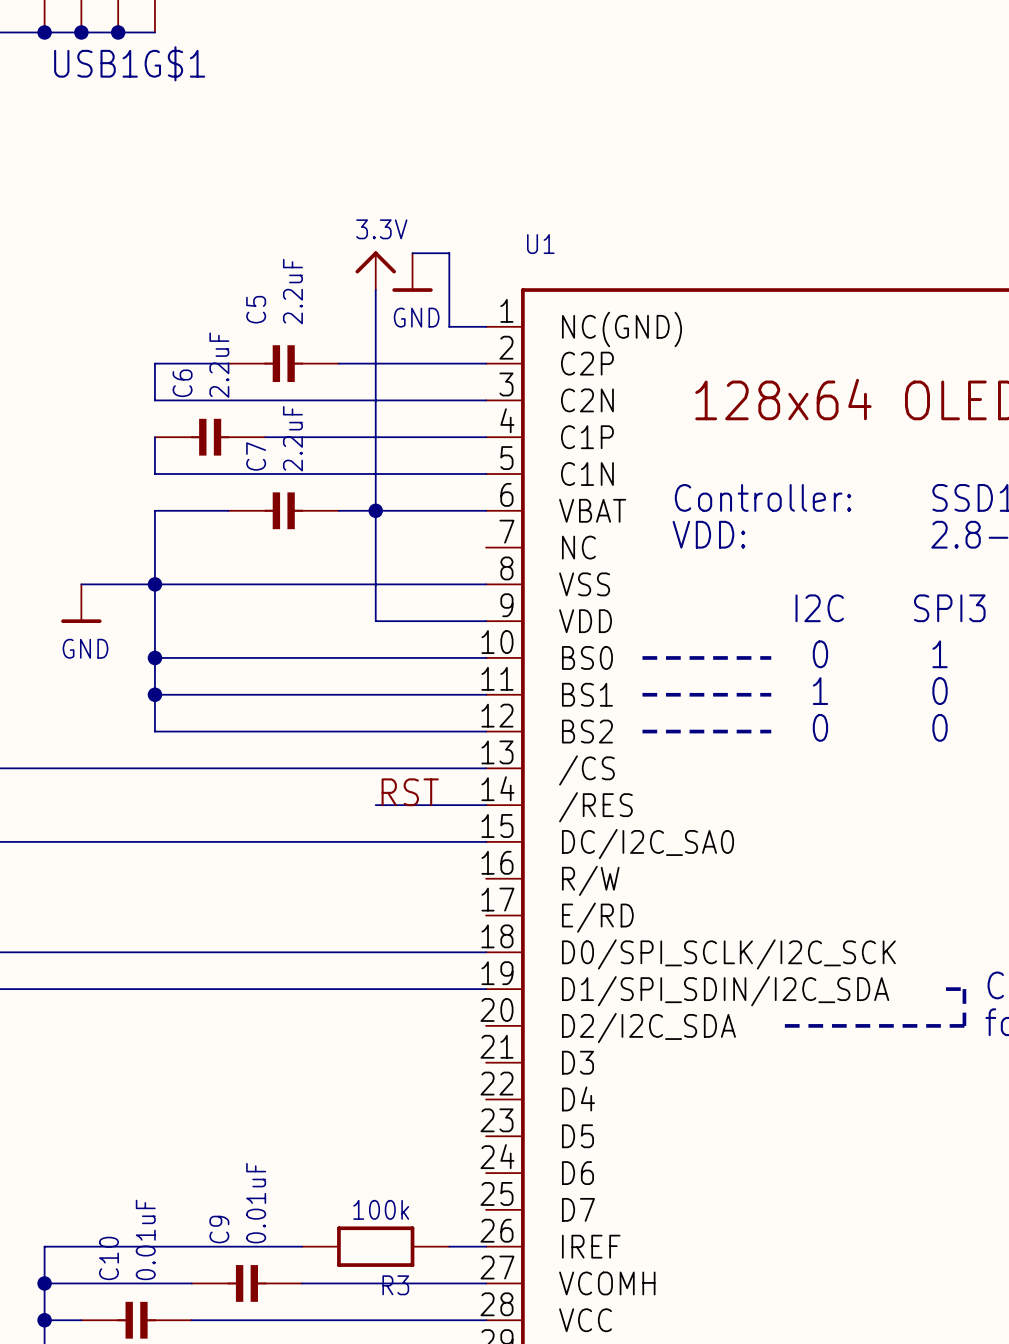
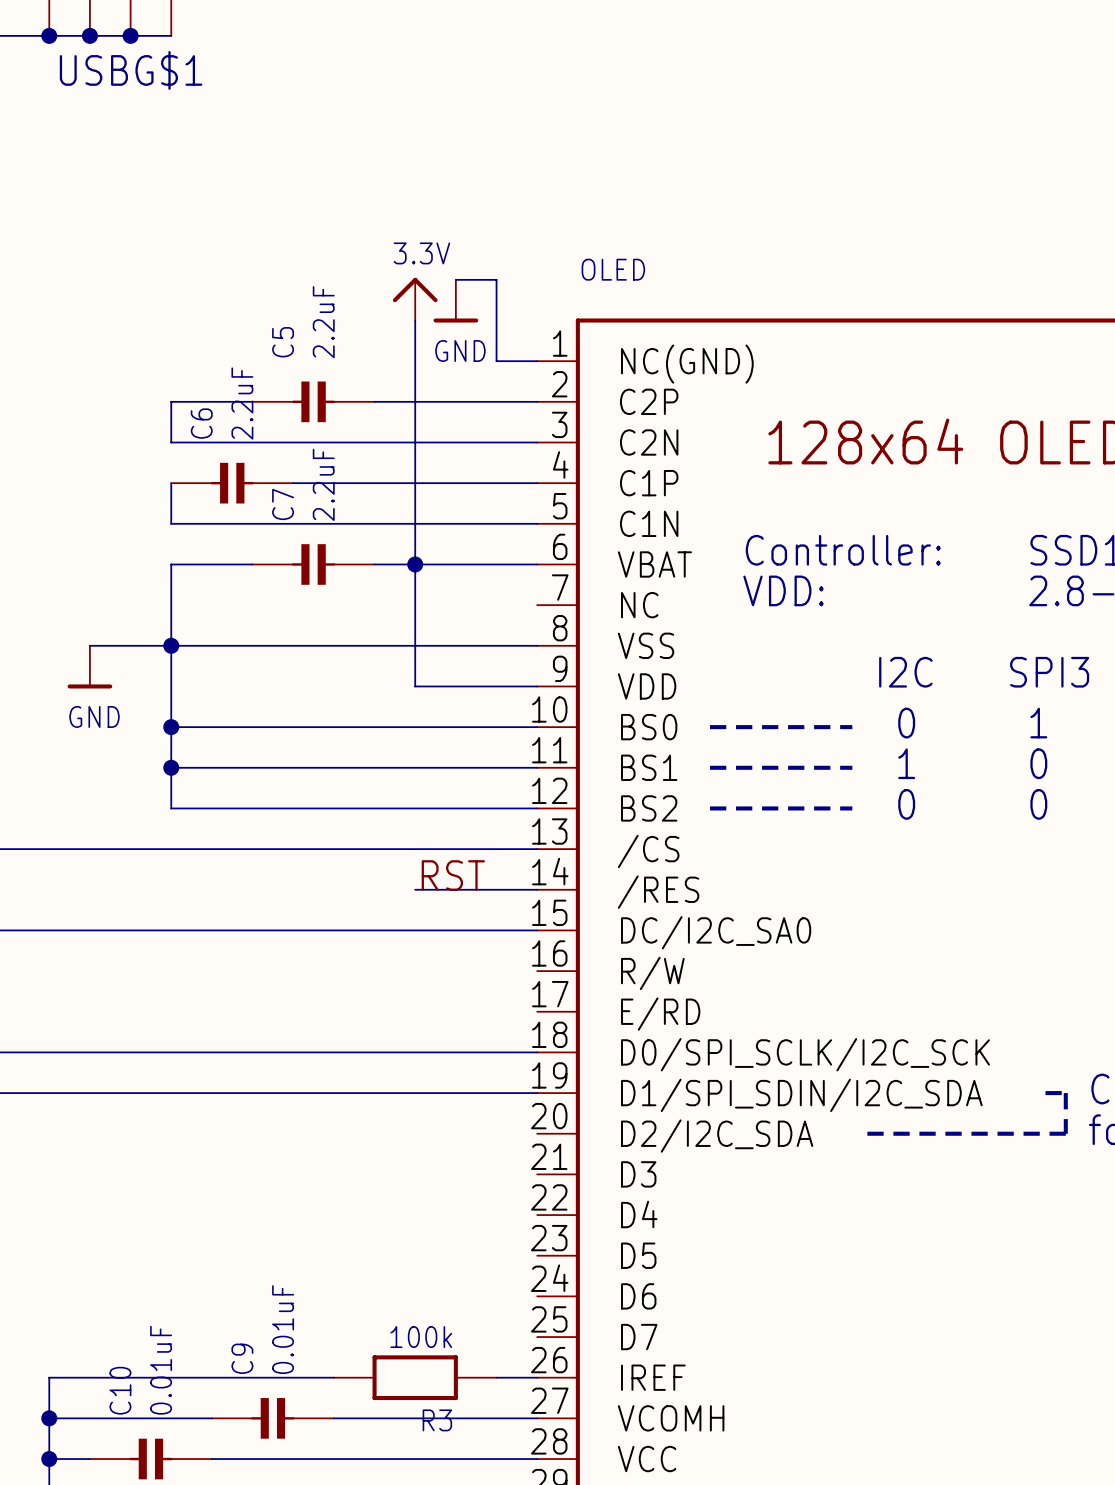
USB1G$1 name: USB1G$1 (129, 63) -> USBG$1 (131, 70)
U1 name: U1 (540, 244) -> OLED (613, 269)

